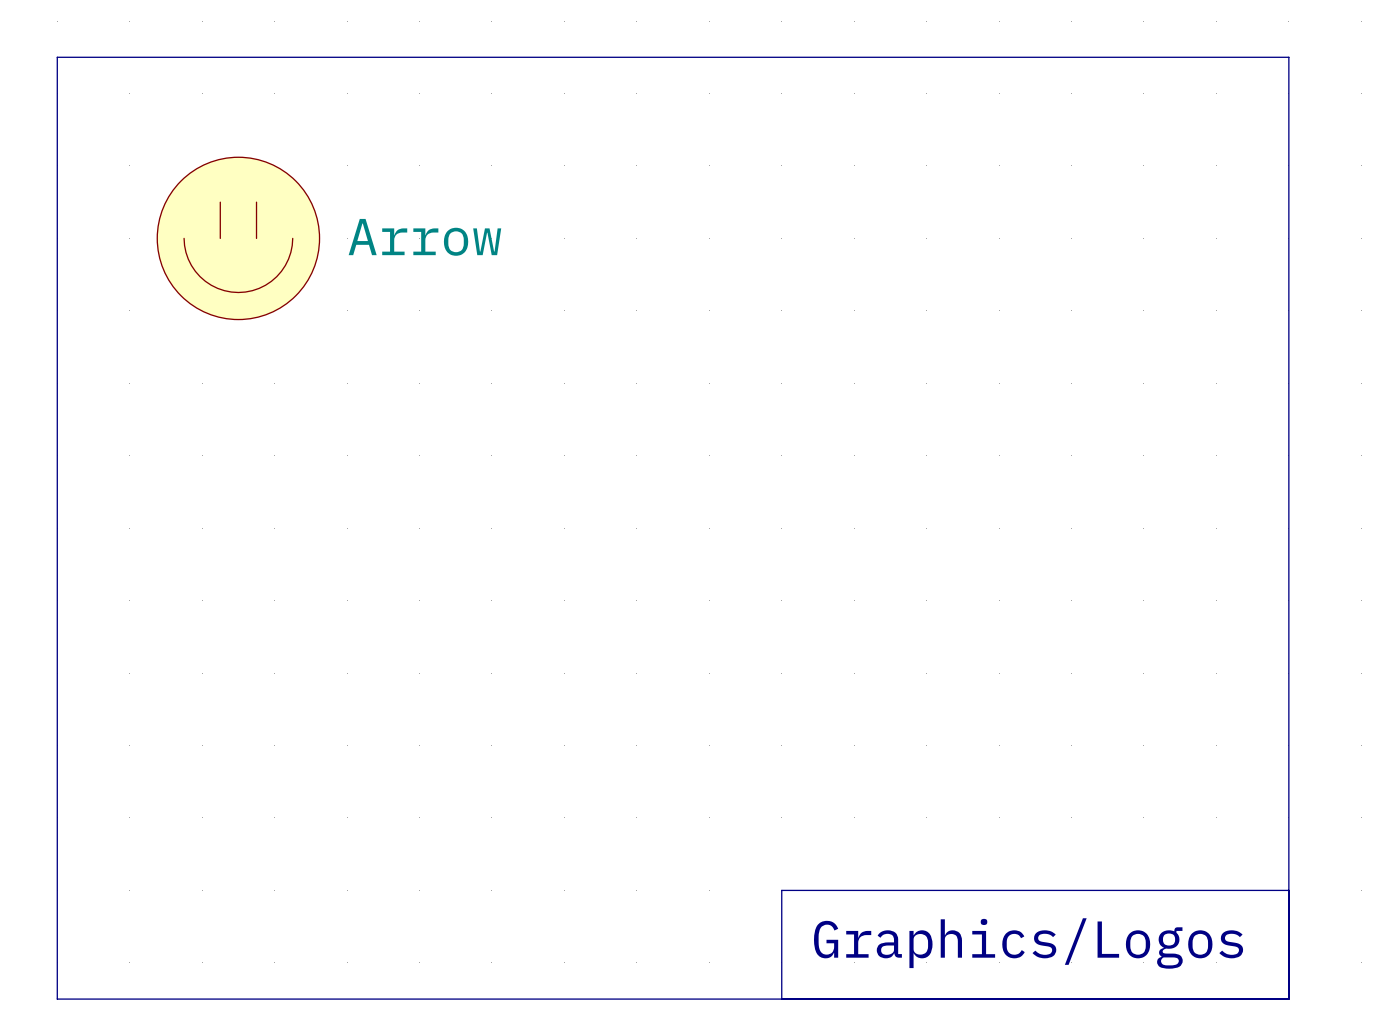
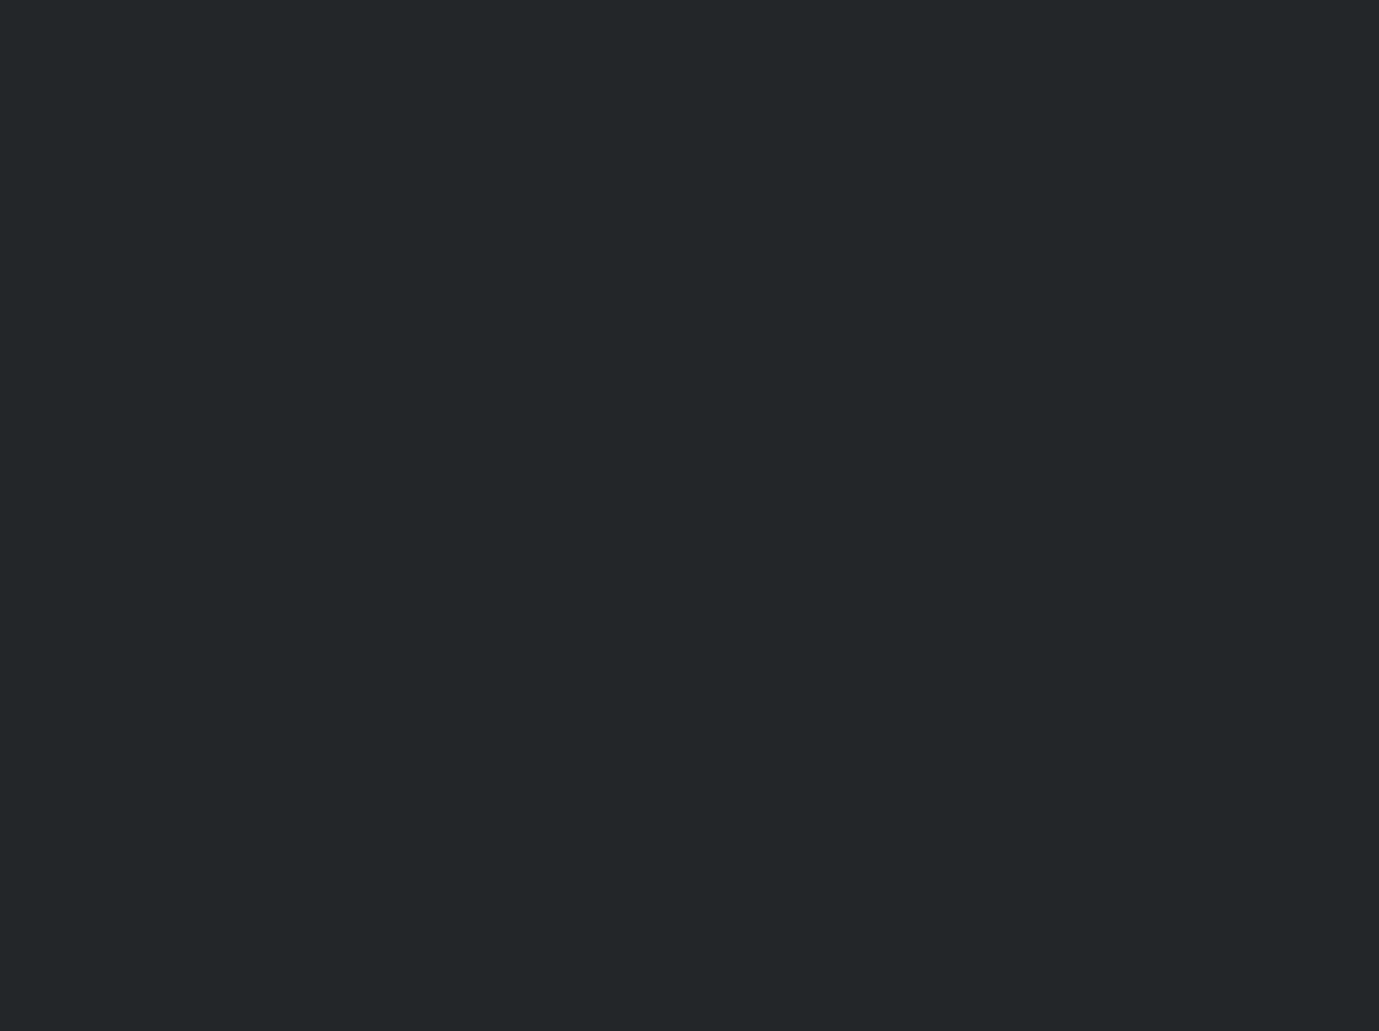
line: (57, 57) (1288, 57) (1288, 999) (57, 999) (57, 57) -> none
part: Arrow (238, 238) -> none
line: (1288, 890) (781, 890) (781, 999) -> none
text: Graphics/Logos (1028, 943) -> none

